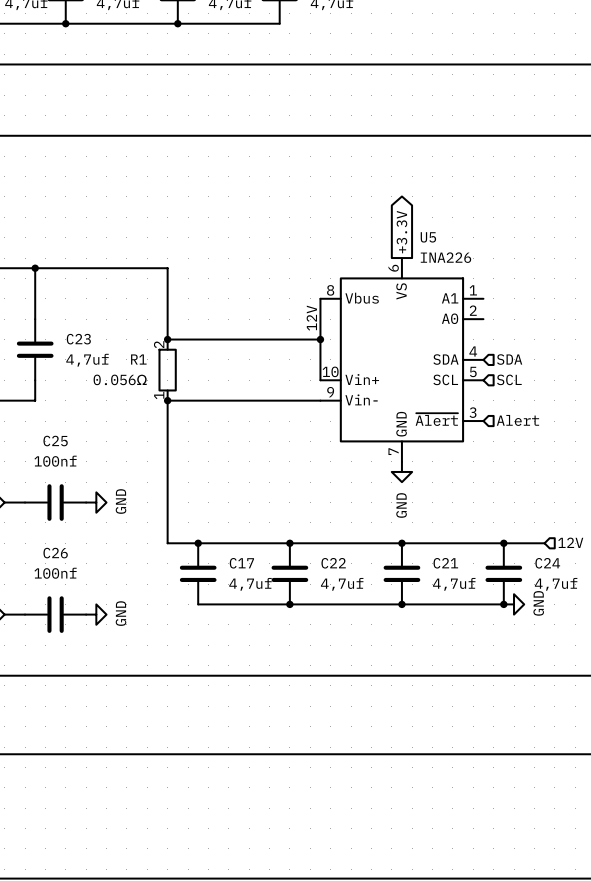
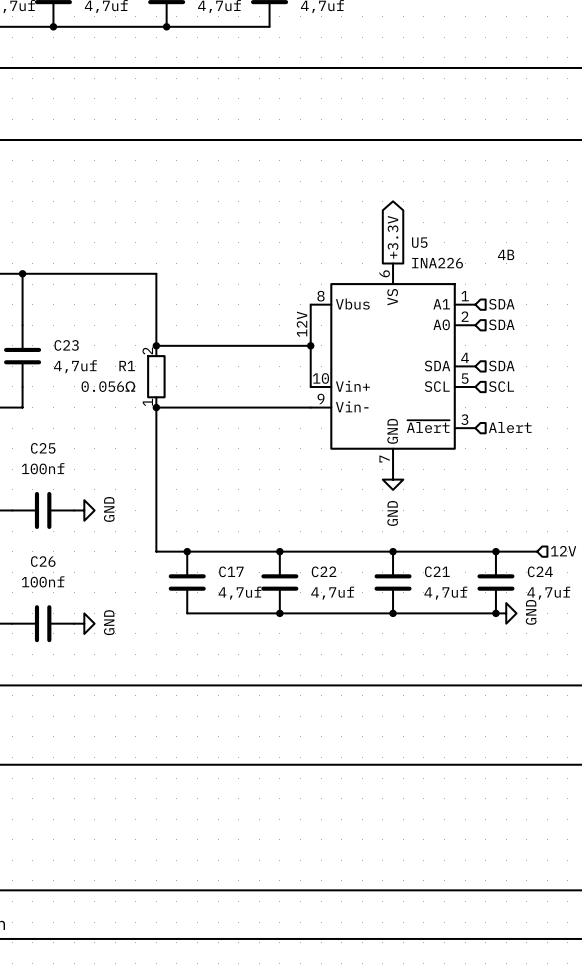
text: none -> 4B (506, 254)
hierarchical label: none -> SDA (501, 304)
hierarchical label: none -> SDA (501, 324)

